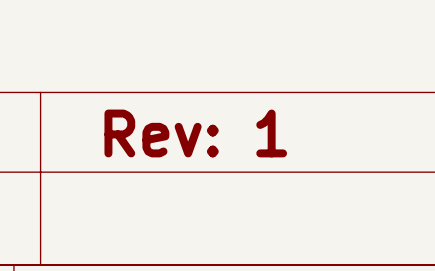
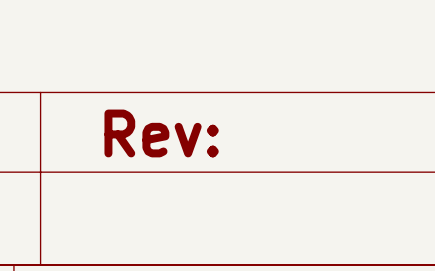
title block: Rev: 1 (195, 133) -> Rev: (161, 133)

